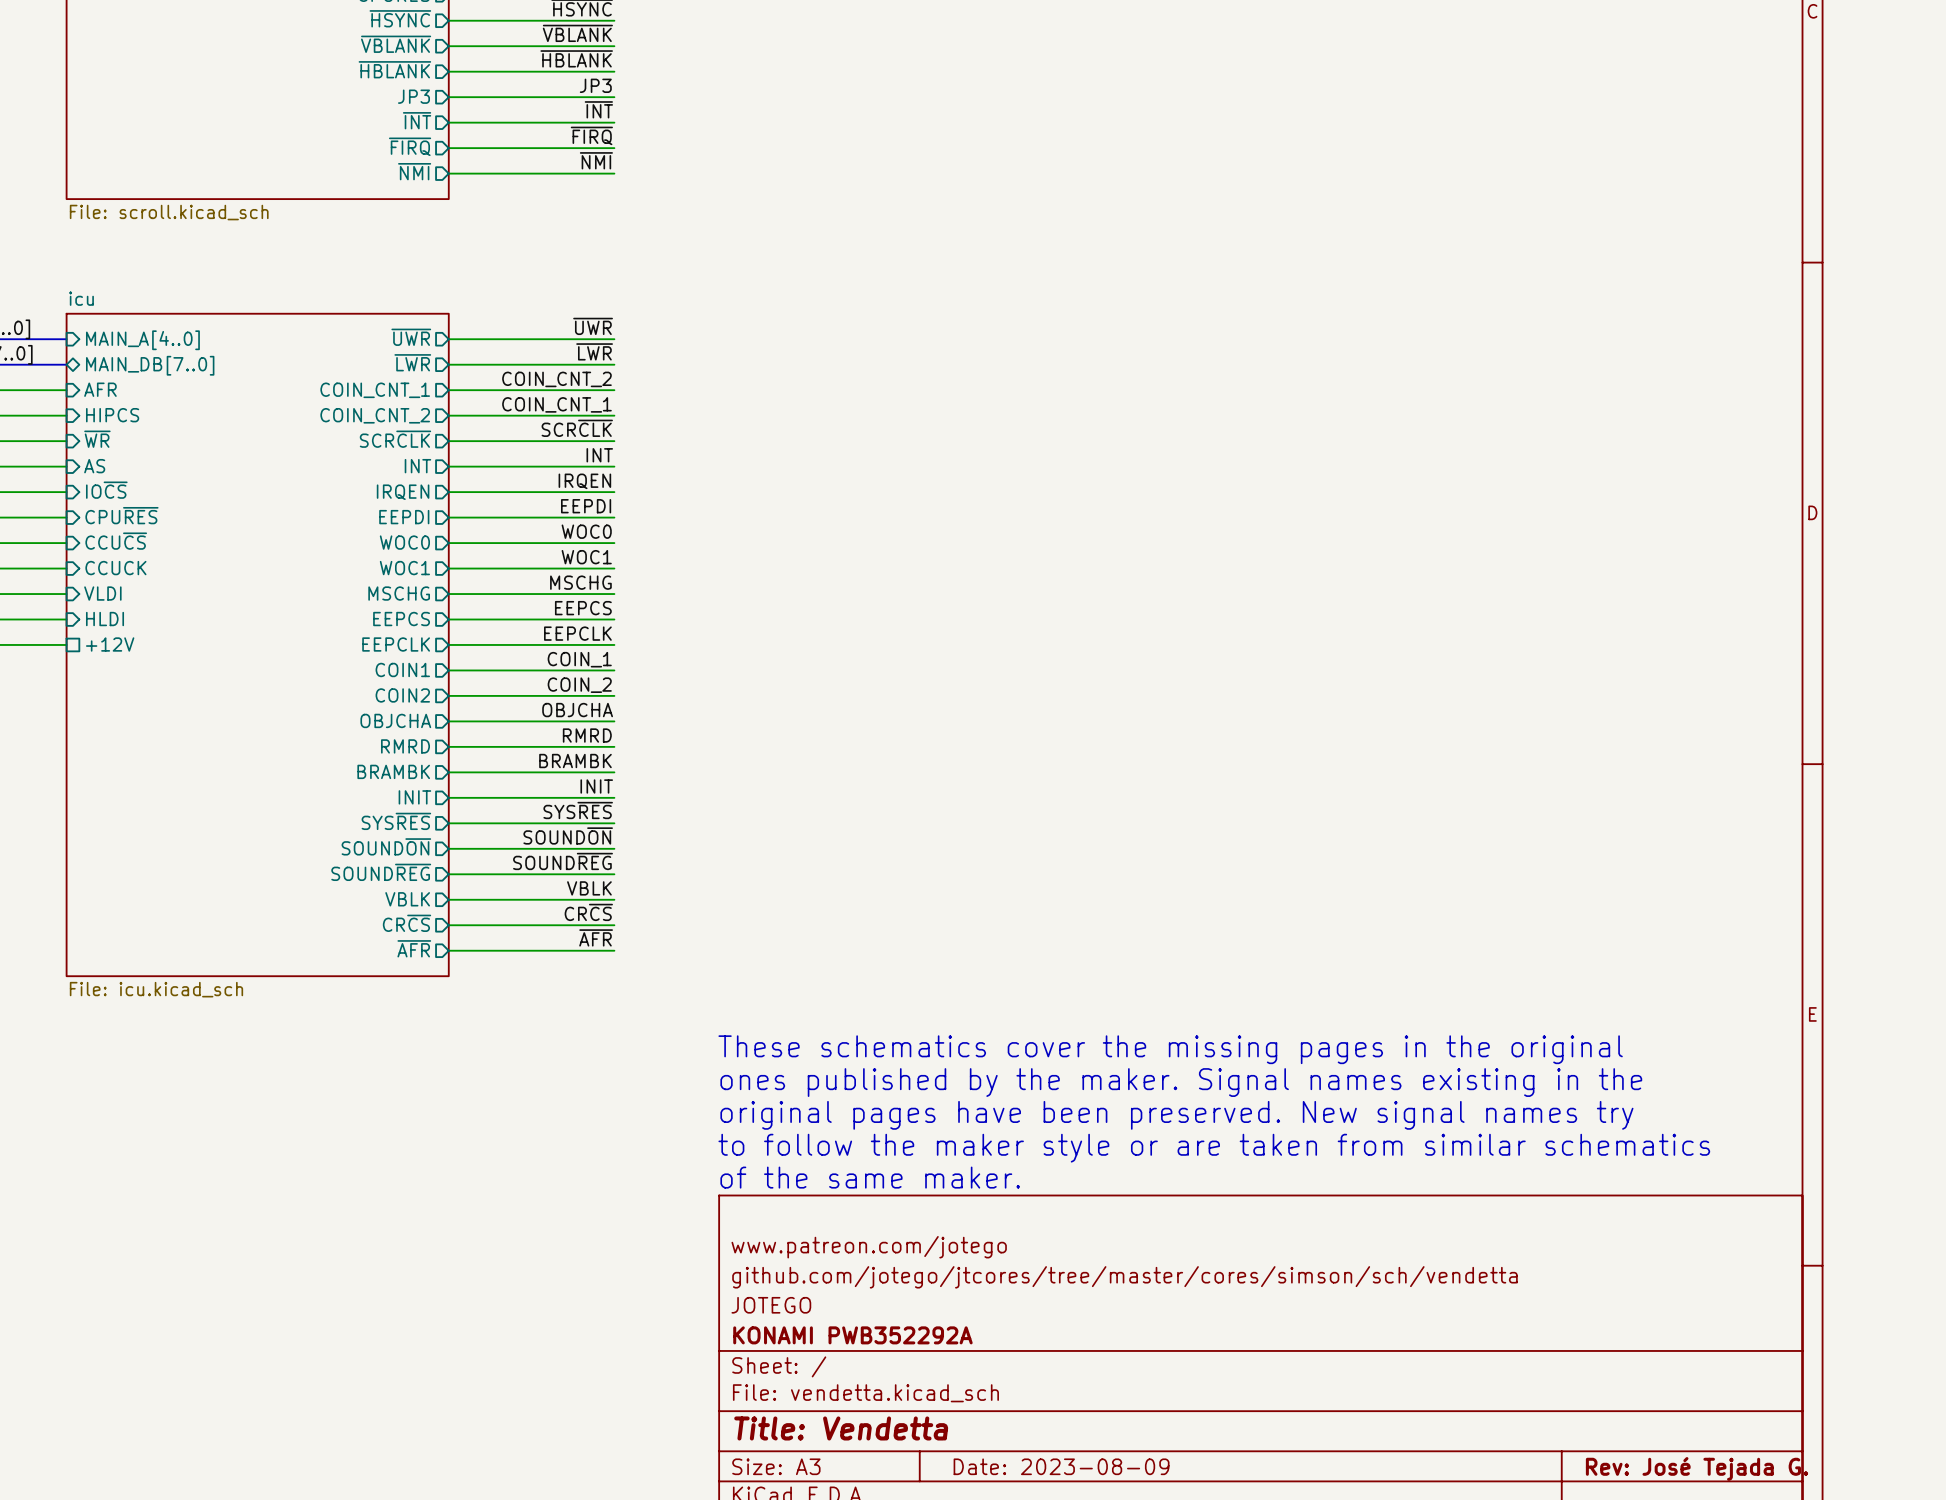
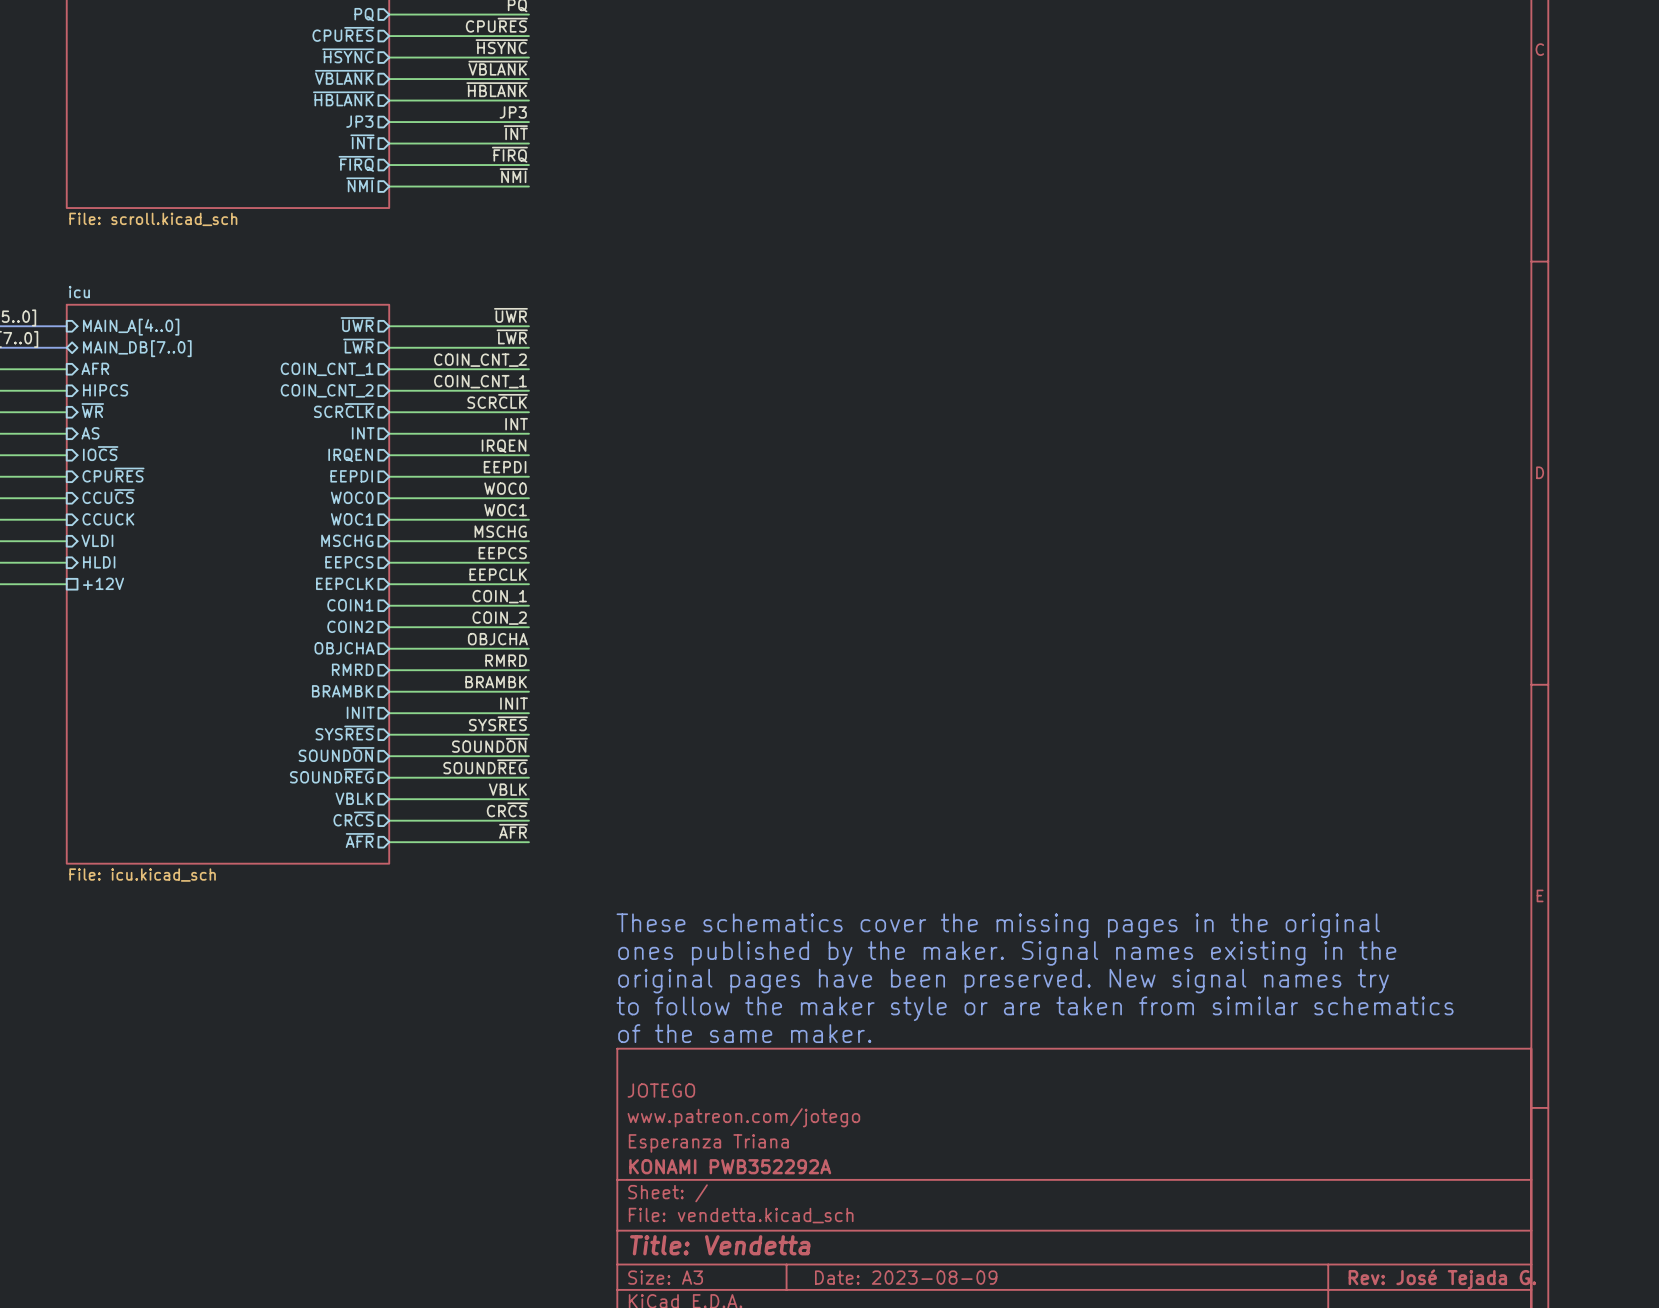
title block: www.patreon.com/jotego (869, 1247) -> JOTEGO (661, 1090)
title block: github.com/jotego/jtcores/tree/master/cores/simson/sch/vendetta (1124, 1277) -> www.patreon.com/jotego (743, 1117)
title block: JOTEGO (771, 1305) -> Esperanza Triana (708, 1143)

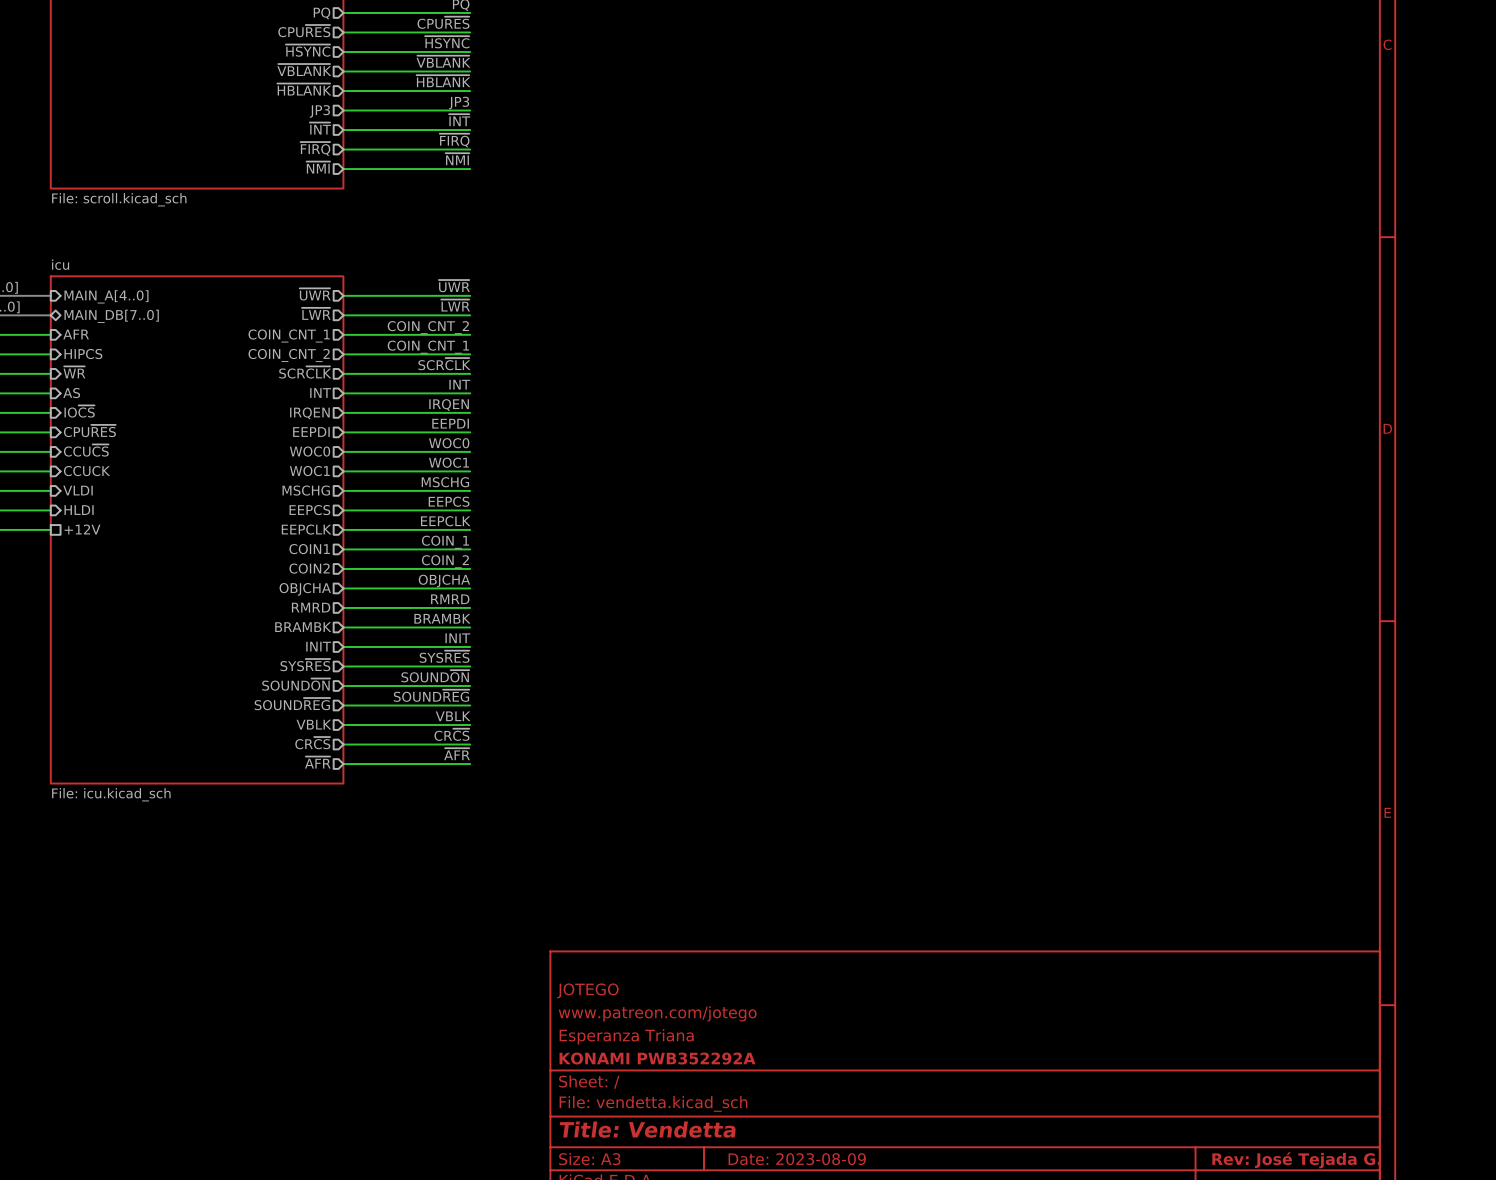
text: These schematics cover the missing pages in the original (998, 925) -> none
text: ones published by the maker. Signal names existing in the (1007, 953) -> none
text: original pages have been preserved. New signal names try (1003, 981) -> none
text: to follow the maker style or are taken from similar schematics (1035, 1008) -> none
text: of the same maker. (744, 1033) -> none

